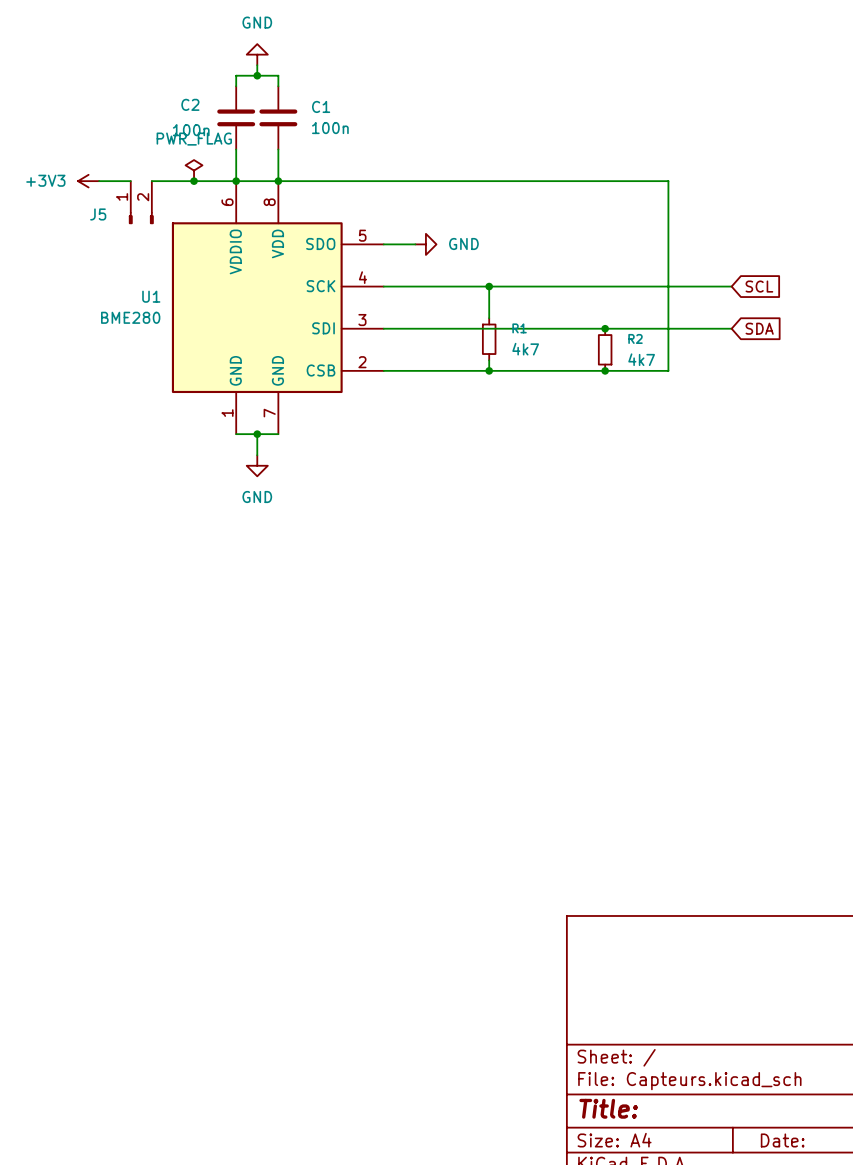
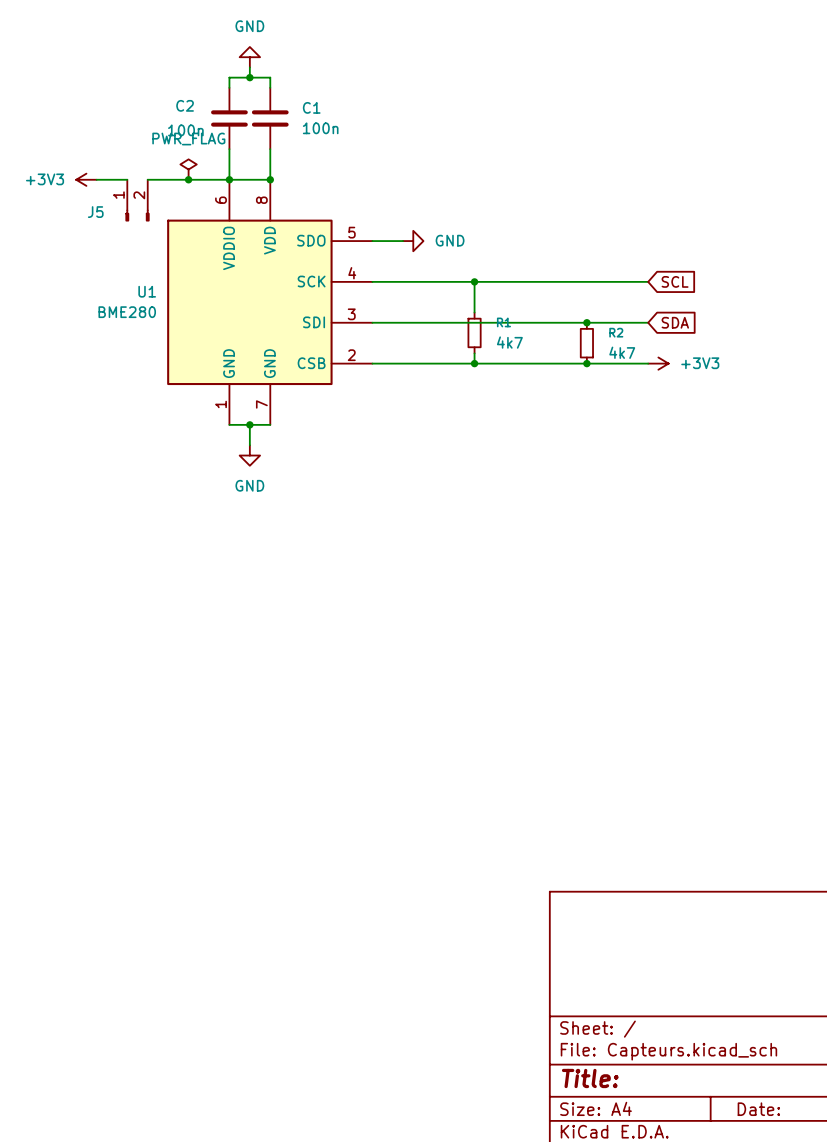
wire: (278, 181) (668, 181) (668, 370) -> none
wire: (668, 286) (731, 286) -> none
global label position: SCL (759, 286) -> SCL (675, 281)
wire: (668, 328) (731, 328) -> none
global label position: SDA (759, 328) -> SDA (675, 322)
power symbol: none -> +3V3 (658, 363)

